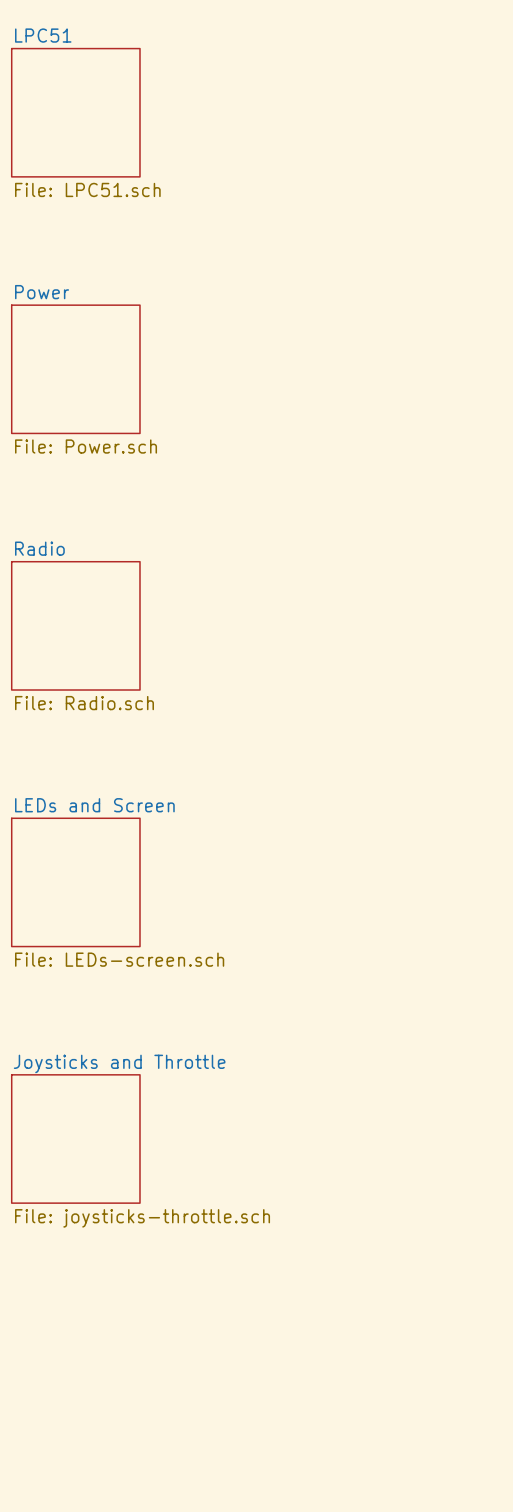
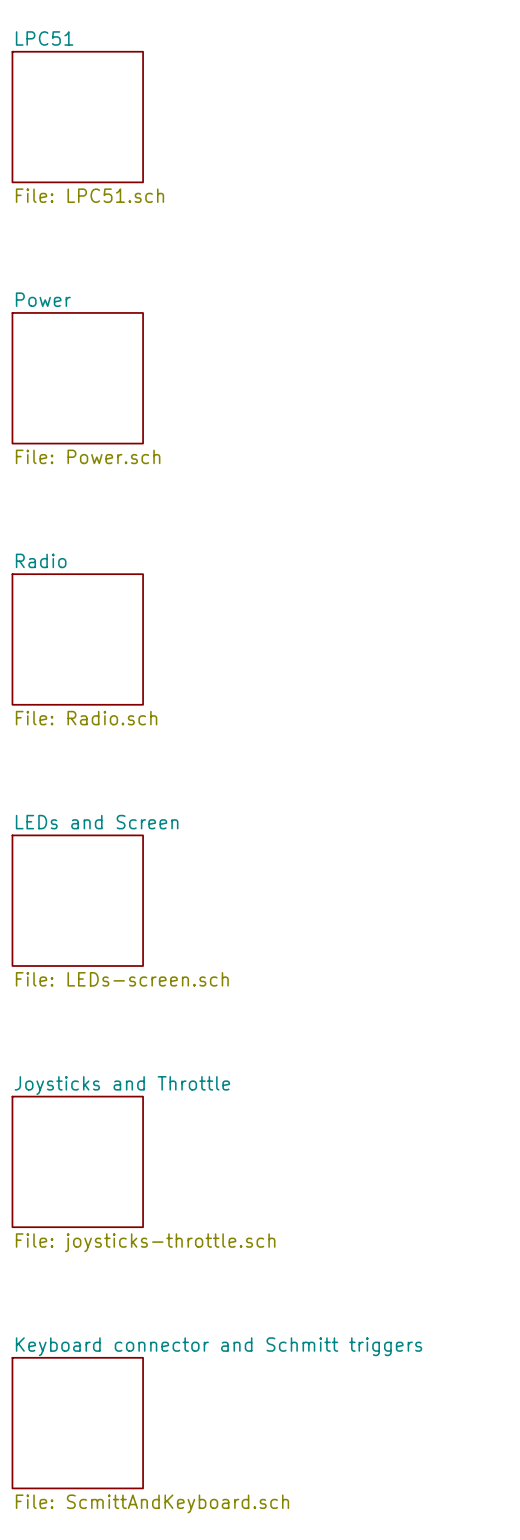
sheet Keyboard connector and Schmitt triggers: none -> File: ScmittAndKeyboard.sch (77, 1423)

